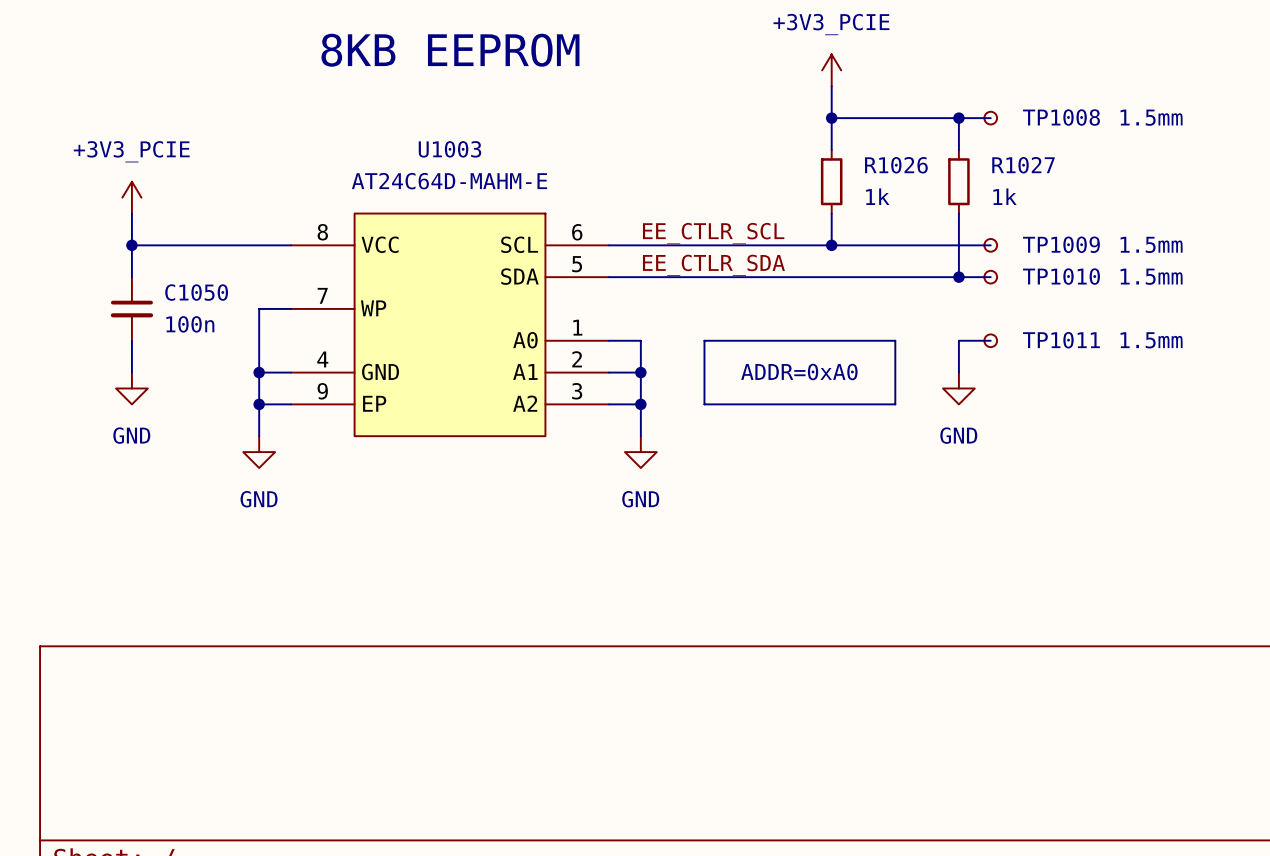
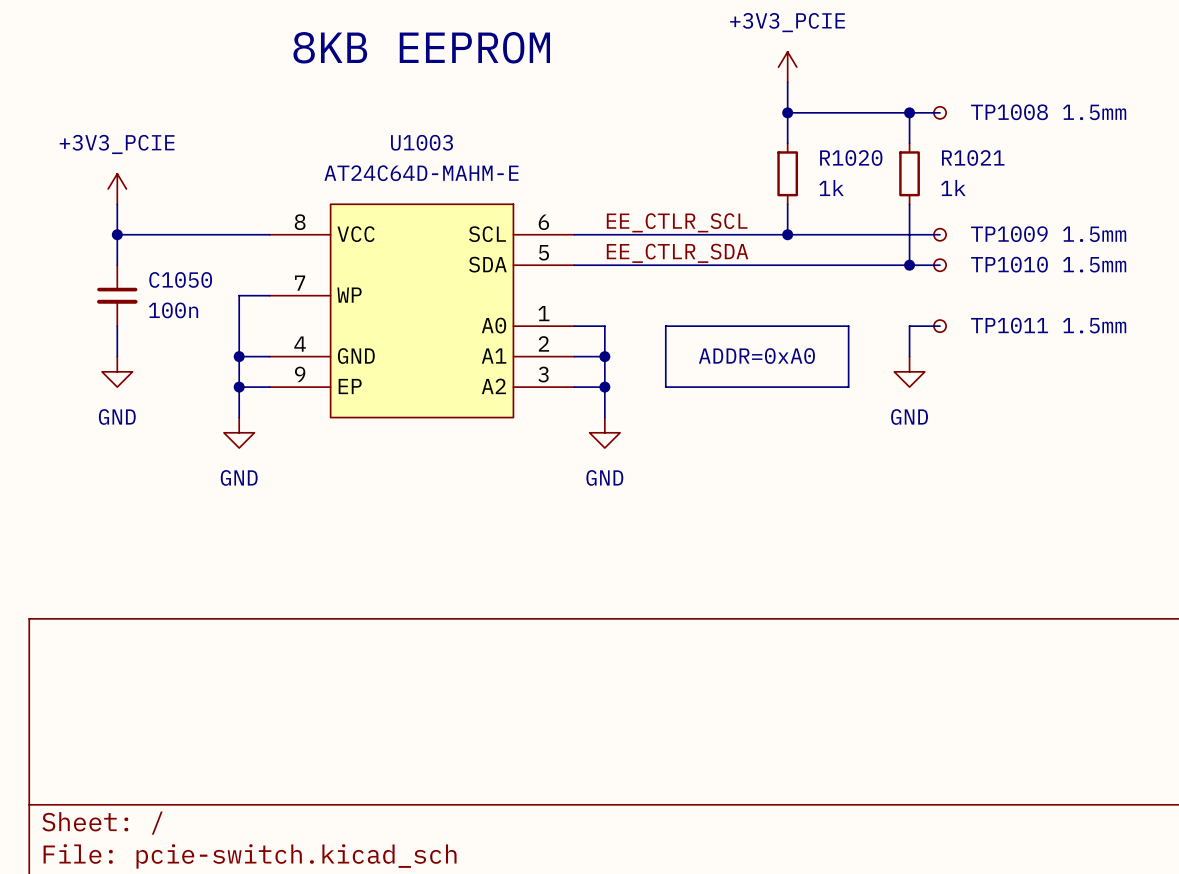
R1026 name: R1026 (896, 165) -> R1020 (851, 157)
R1027 name: R1027 (1023, 165) -> R1021 (973, 157)

